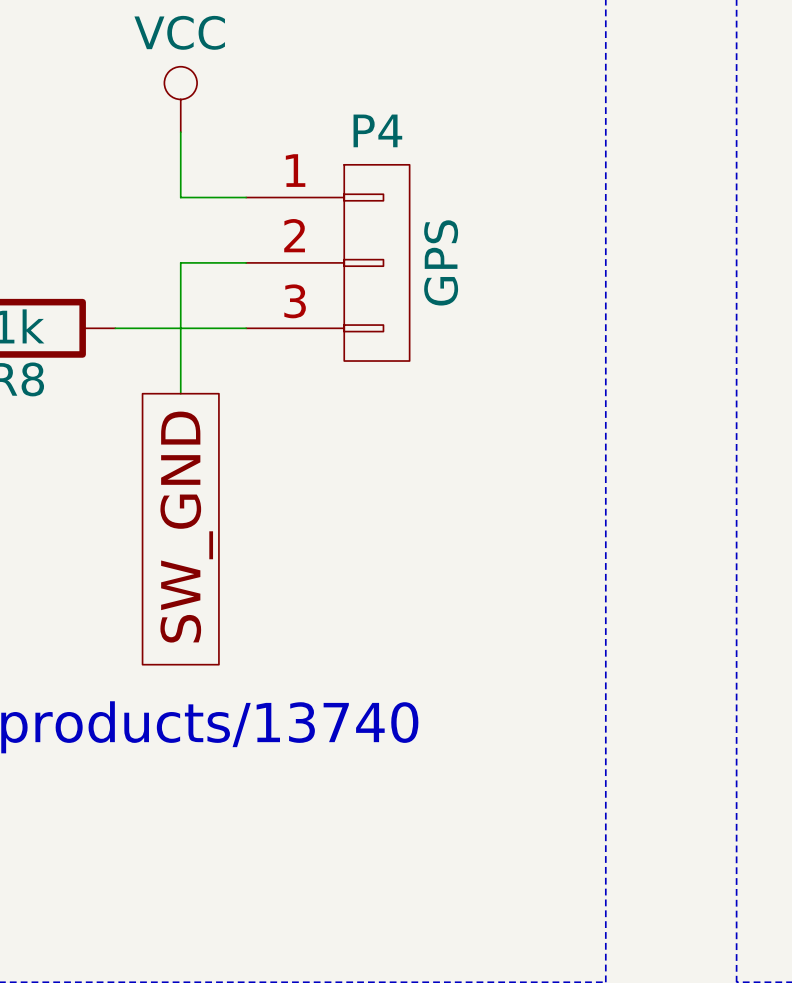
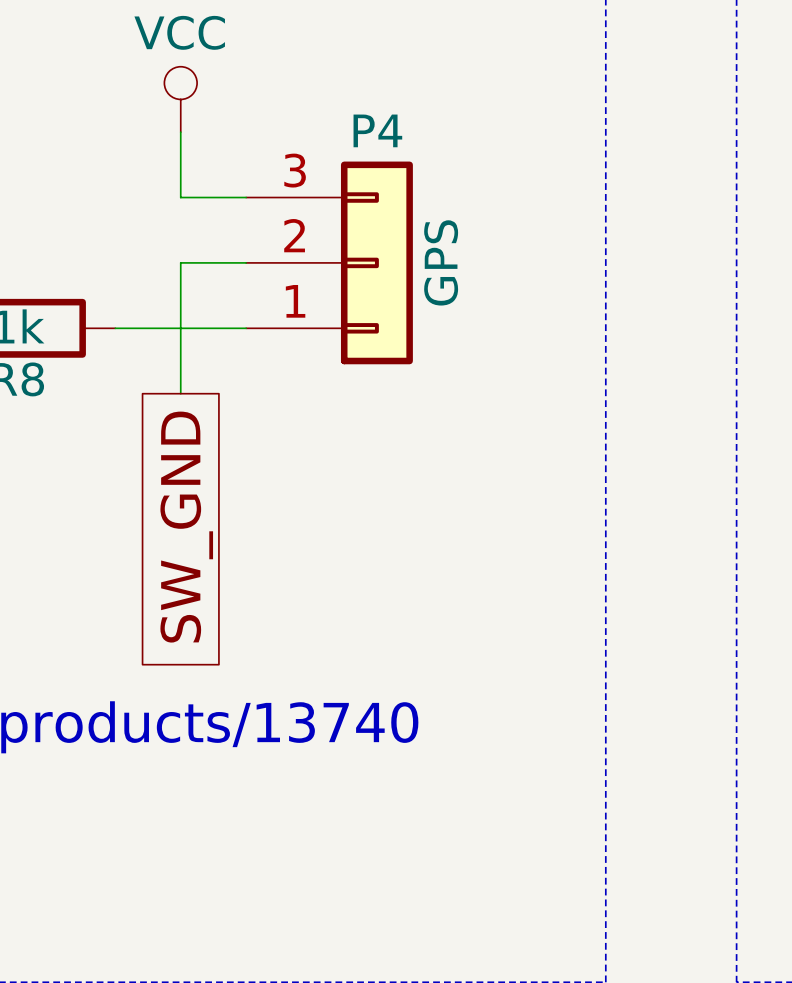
P4 symbol: [246, 164, 410, 362] -> [246, 161, 413, 365]

